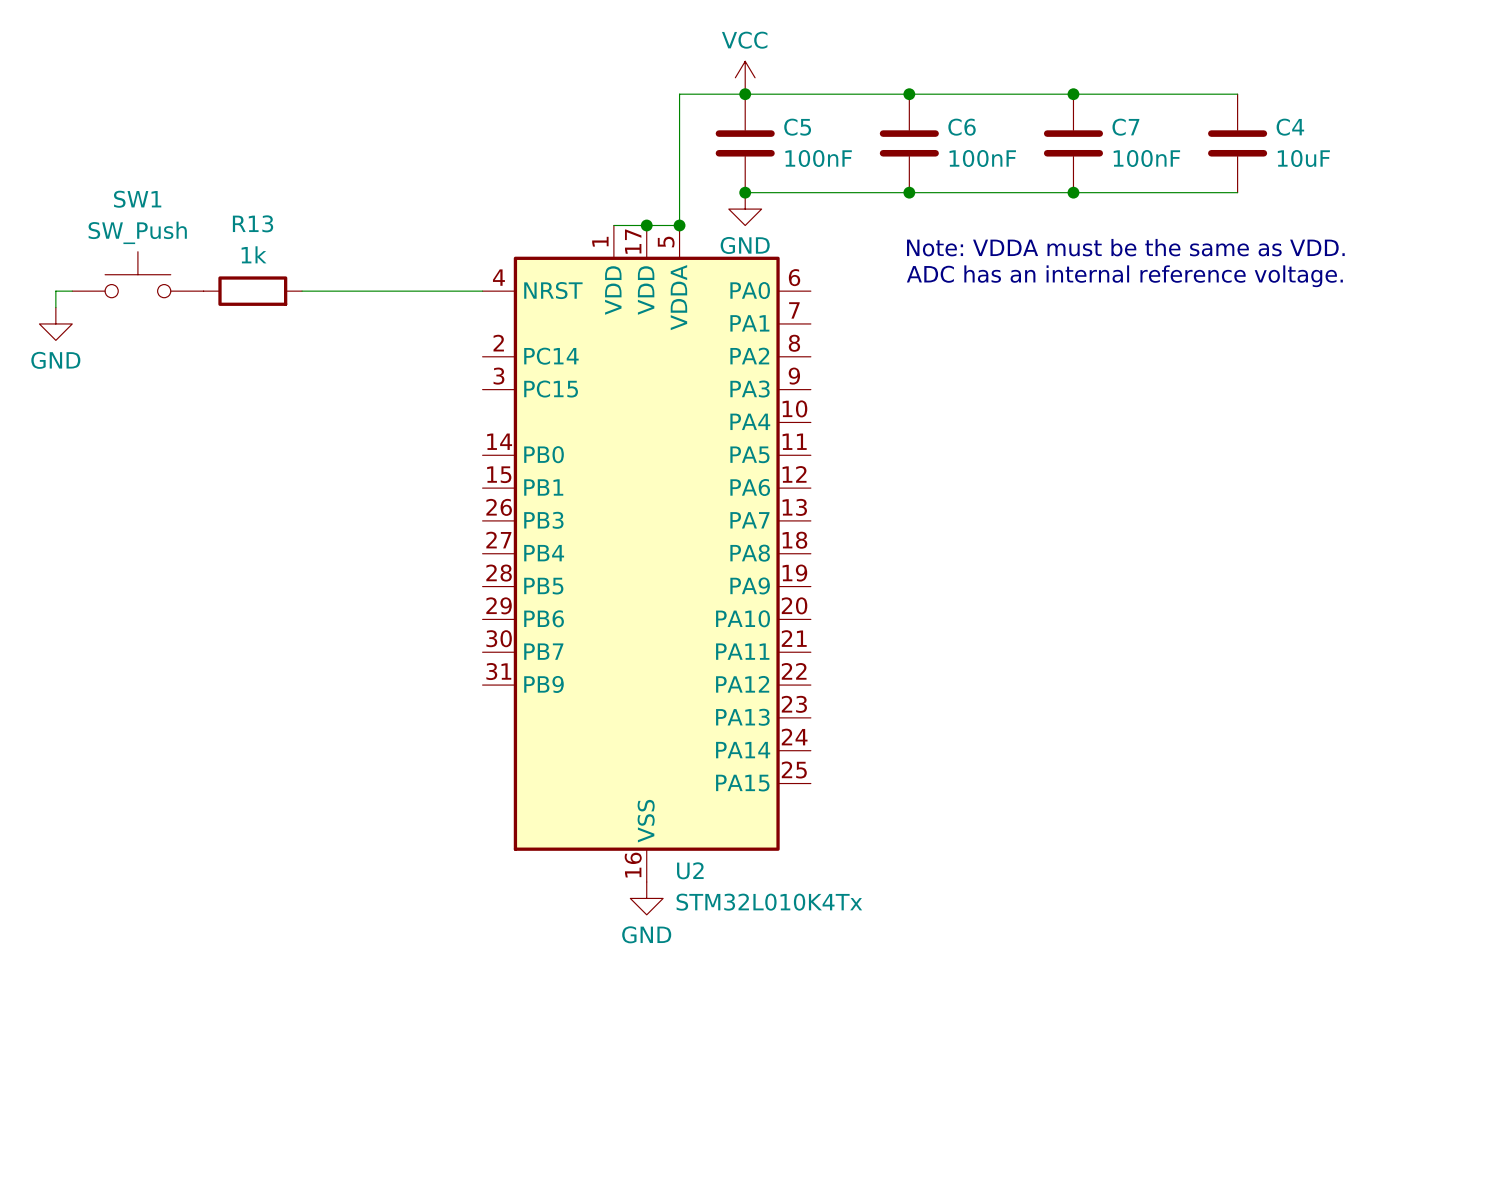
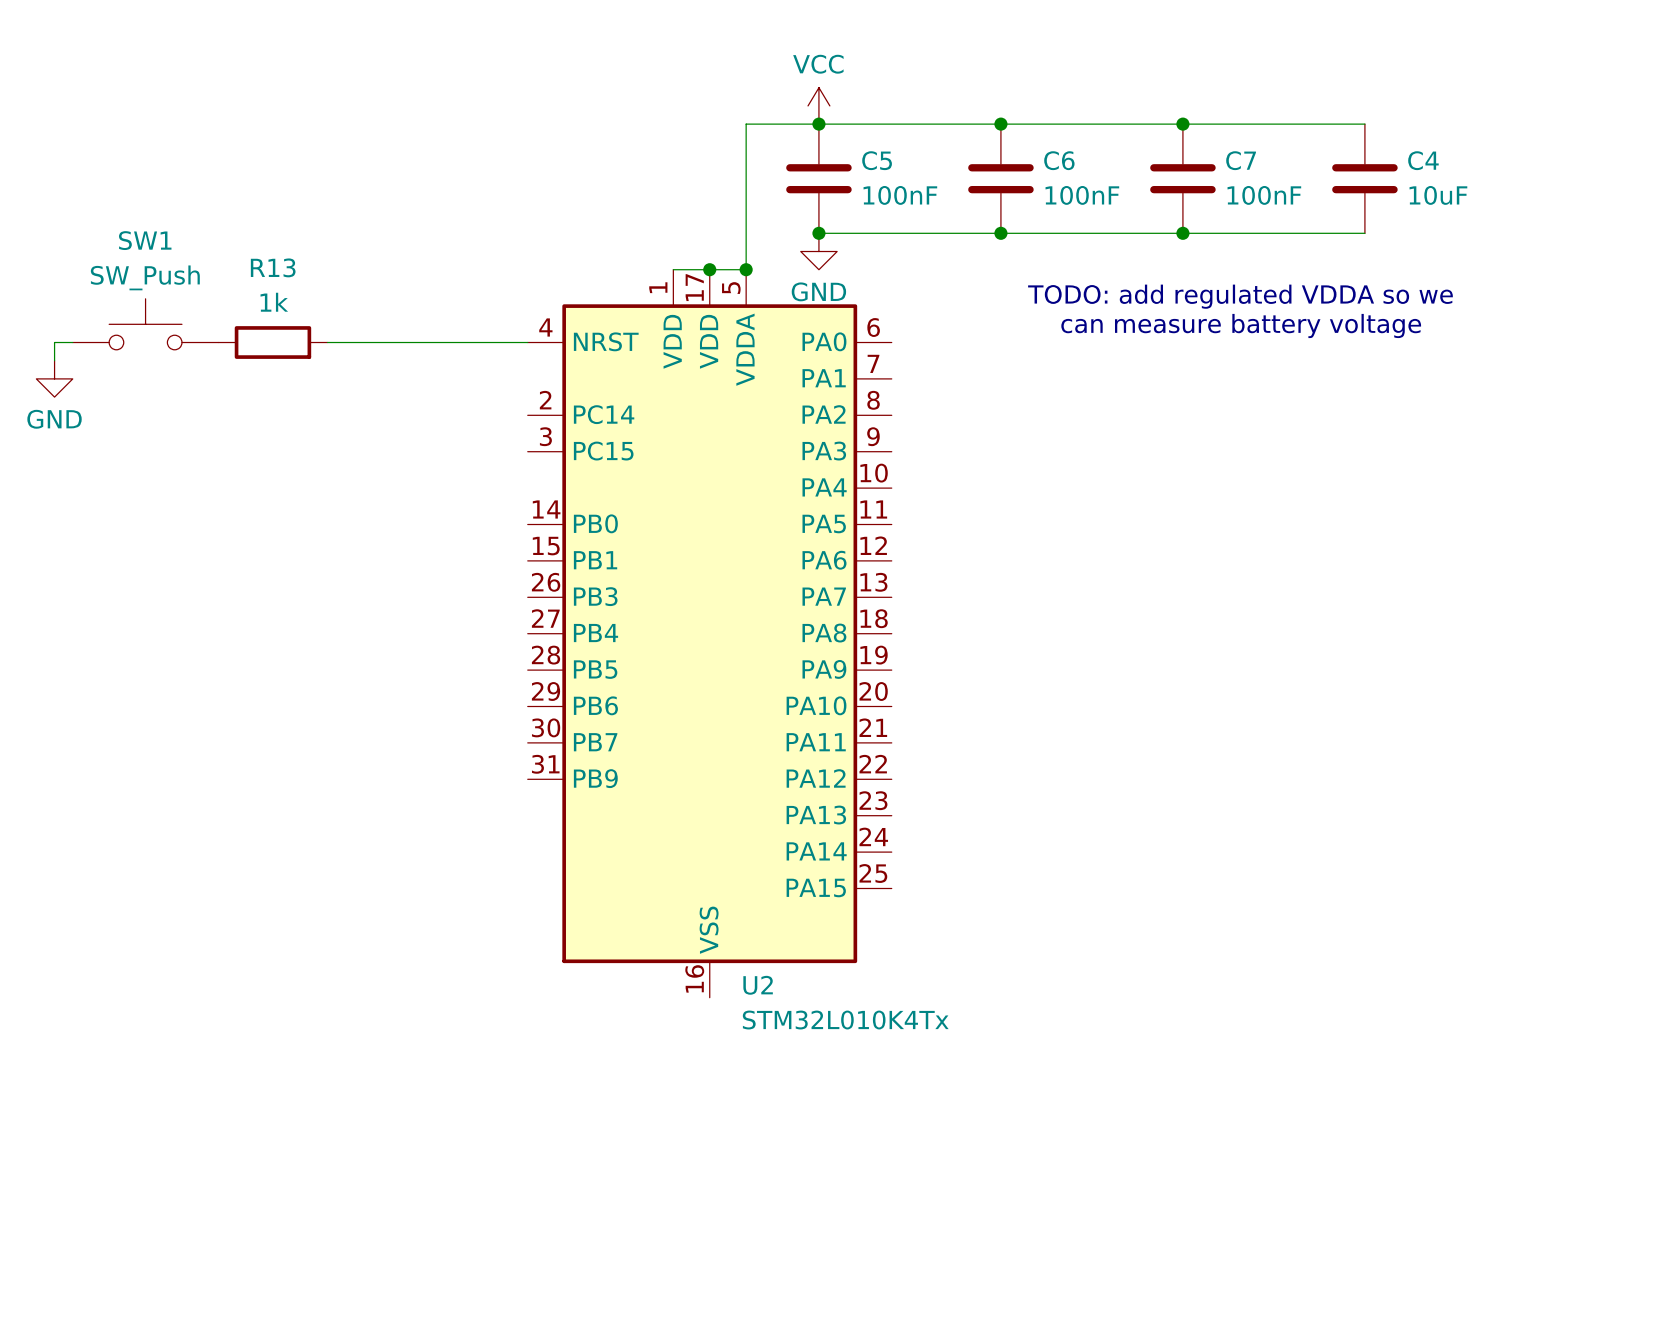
text: Note: VDDA must be the same as VDD. (1125, 247) -> TODO: add regulated VDDA so we (1240, 296)
text: ADC has an internal reference voltage. (1124, 276) -> can measure battery voltage (1241, 325)
power symbol: GND (646, 898) -> none

